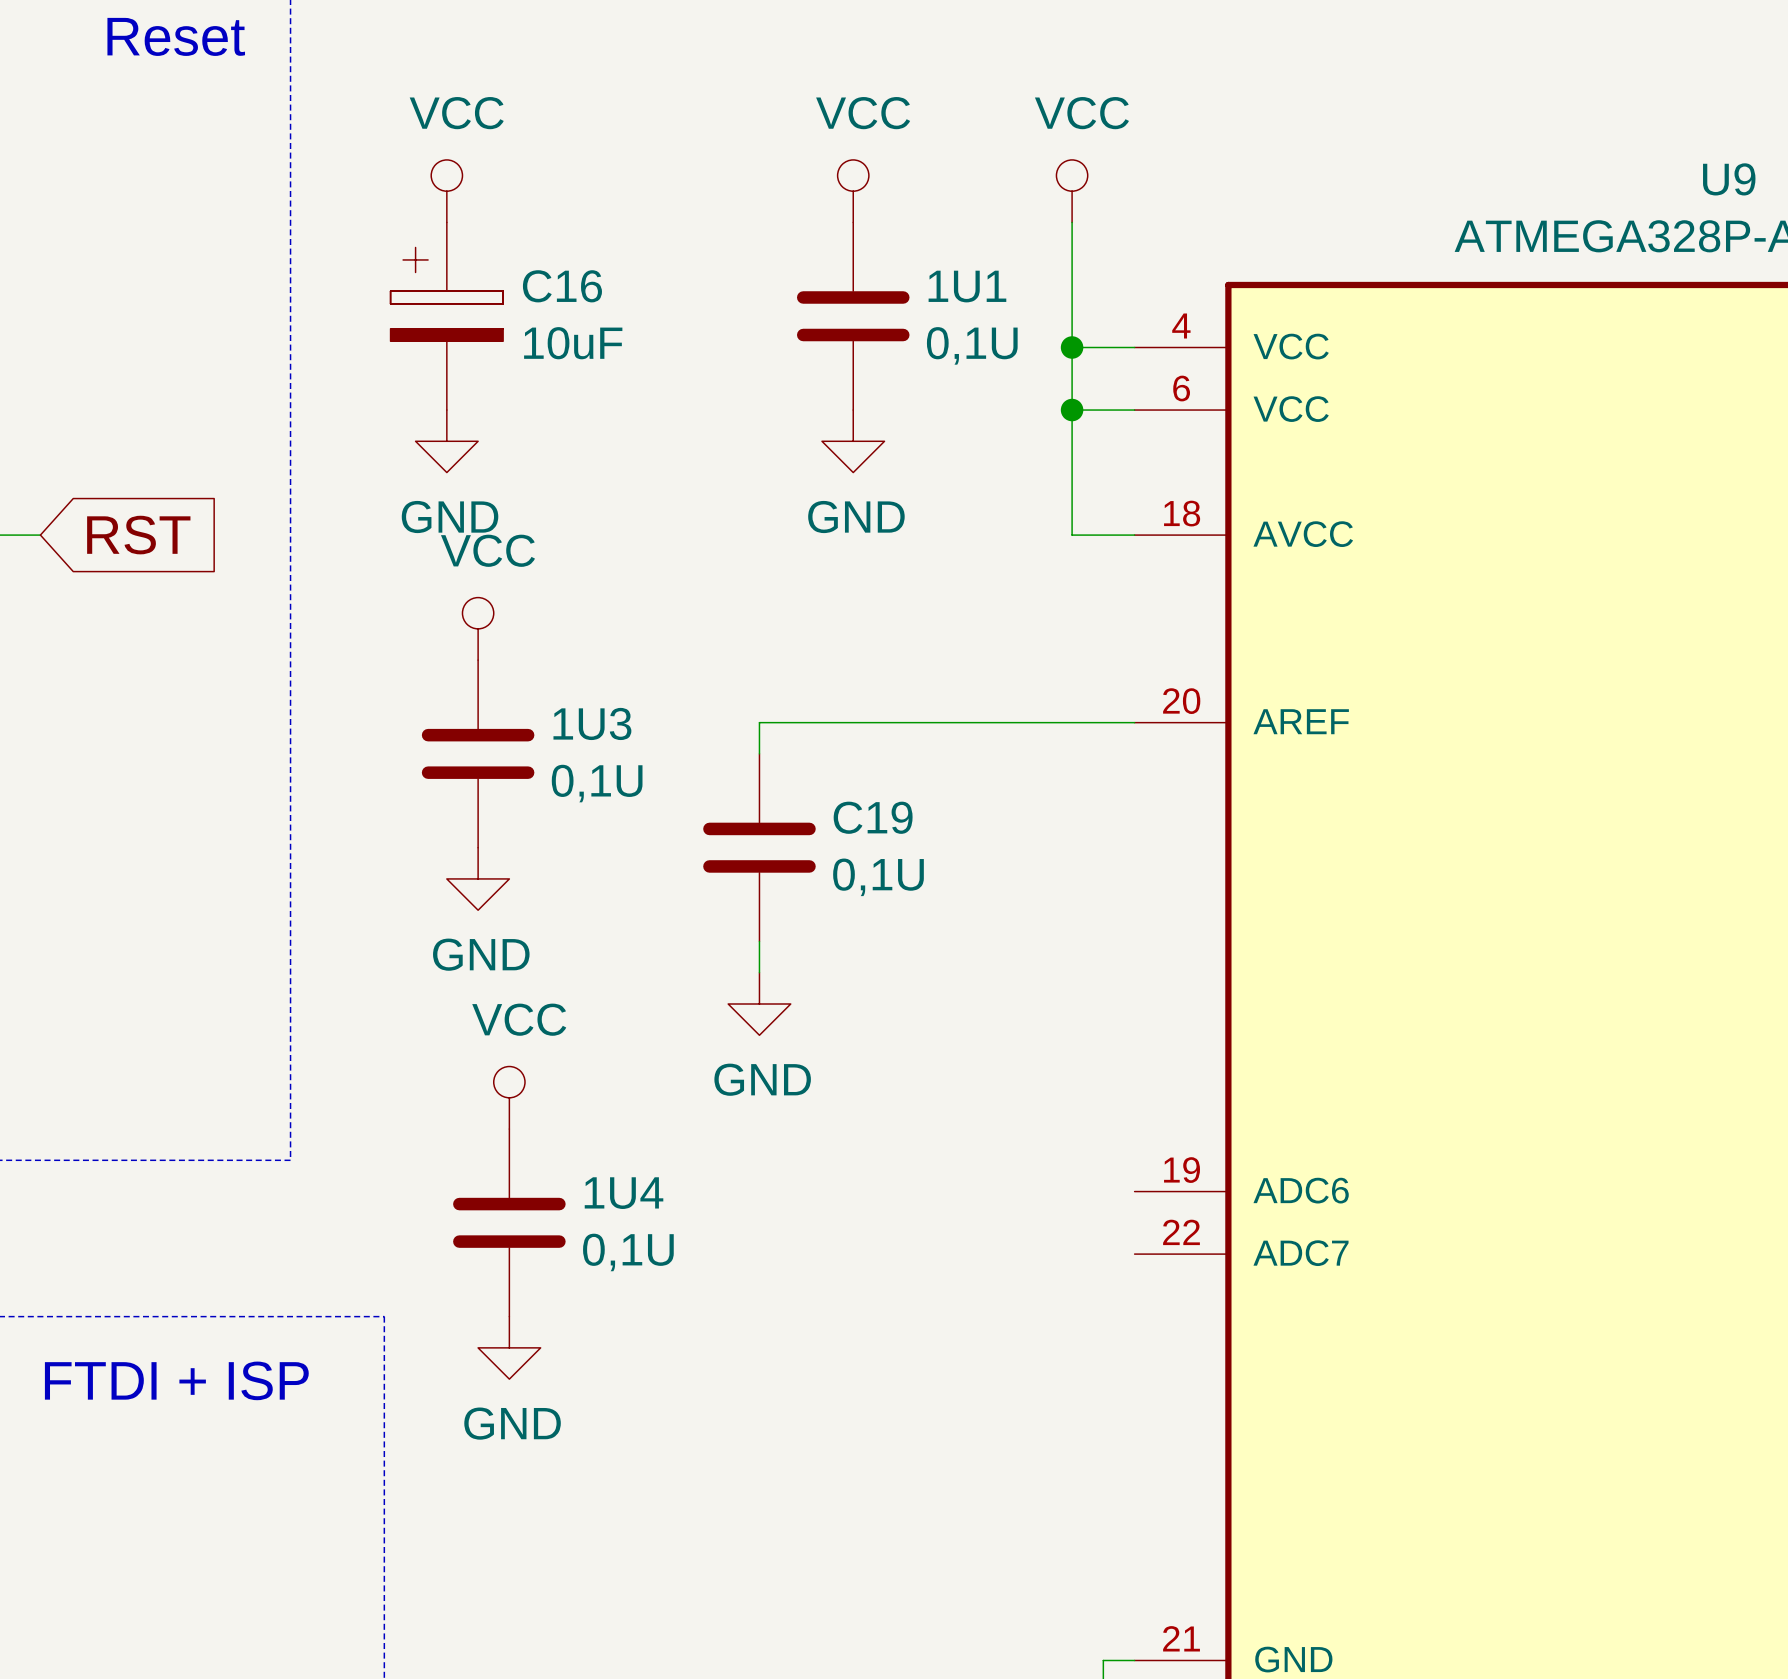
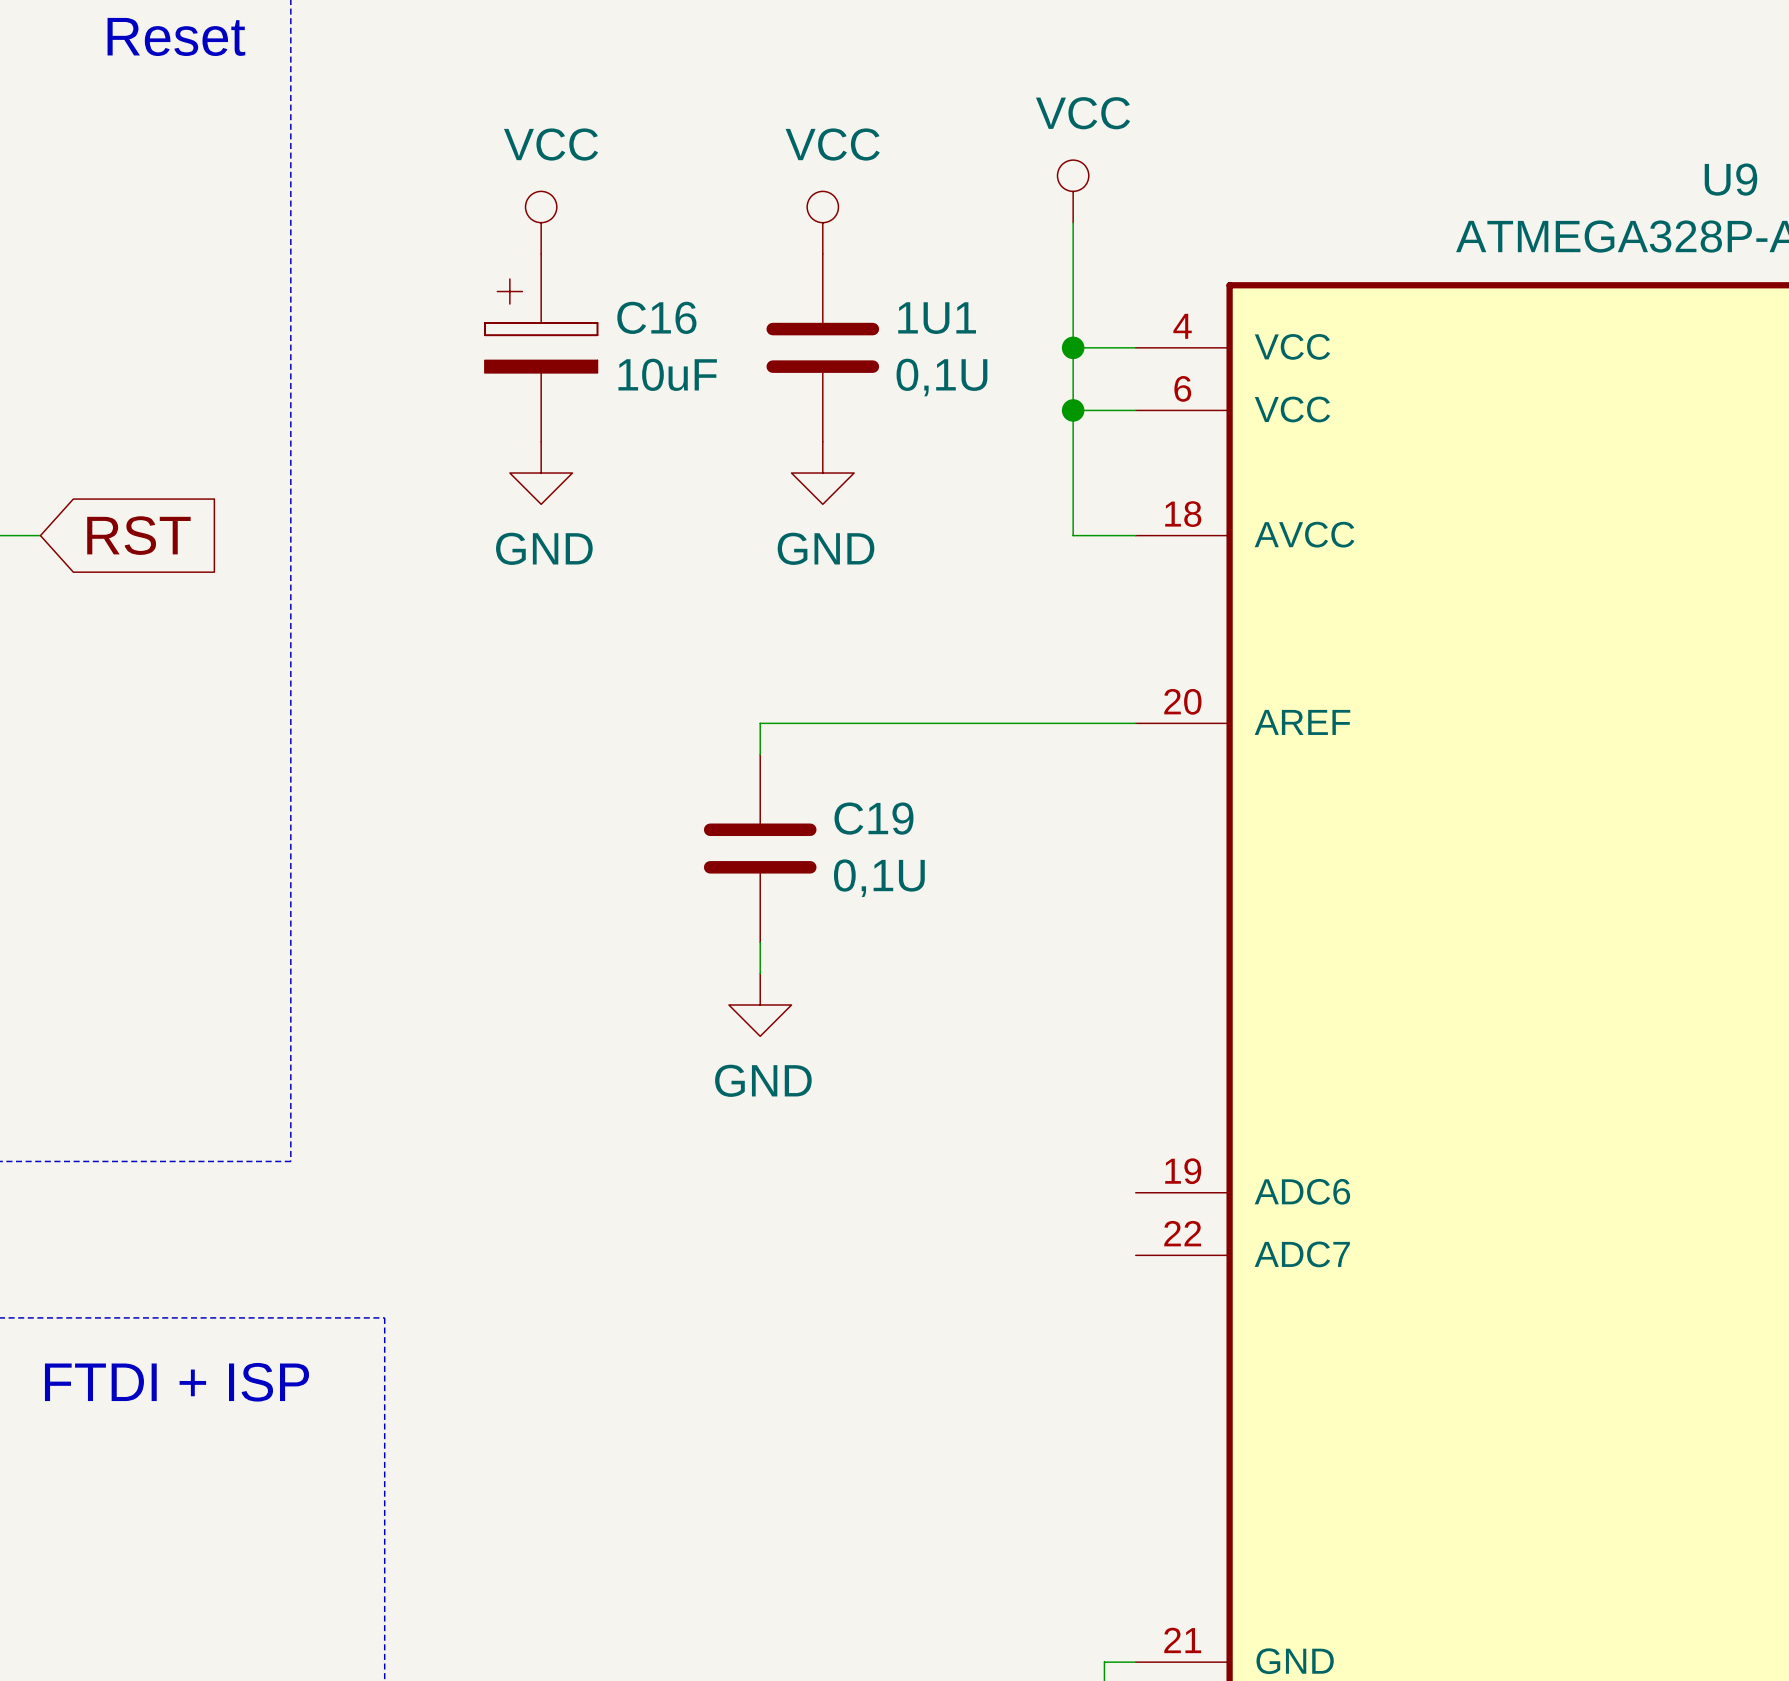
power symbol position: VCC (446, 191) -> VCC (541, 222)
power symbol position: VCC (853, 191) -> VCC (822, 222)
C16 position: (446, 316) -> (541, 347)
1U1 position: (853, 316) -> (822, 347)
power symbol position: GND (446, 441) -> GND (541, 473)
power symbol position: GND (853, 441) -> GND (822, 473)
power symbol: VCC (478, 628) -> none
1U3: 0,1U (478, 753) -> none
power symbol: GND (478, 878) -> none
power symbol: VCC (509, 1097) -> none
1U4: 0,1U (509, 1222) -> none
power symbol: GND (509, 1347) -> none

